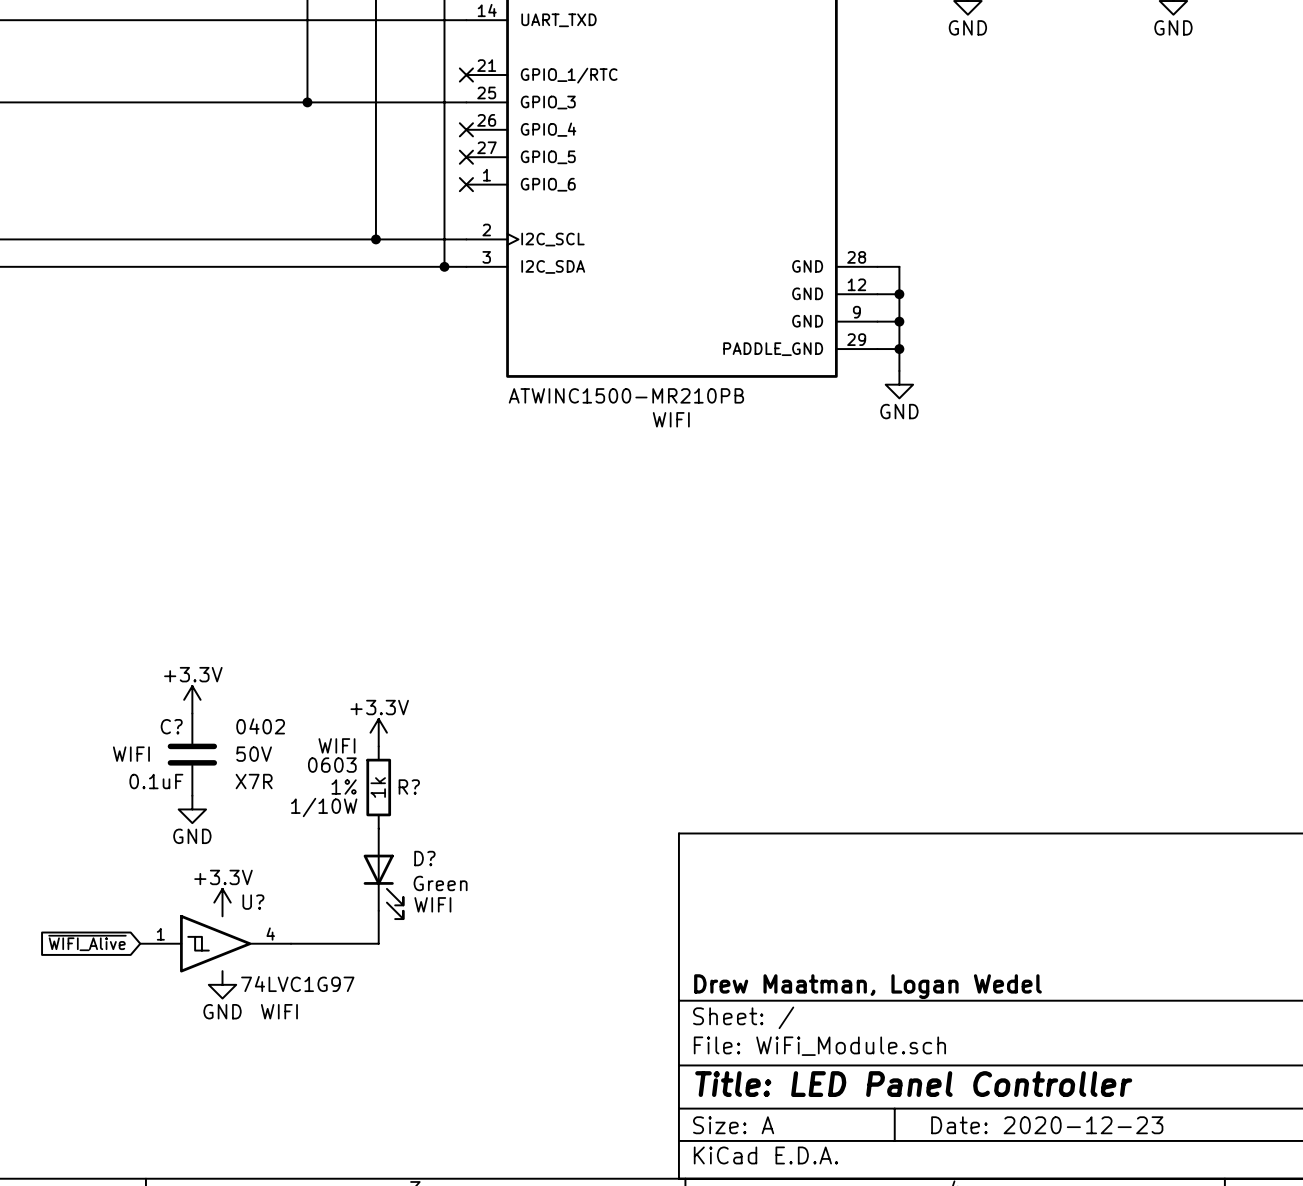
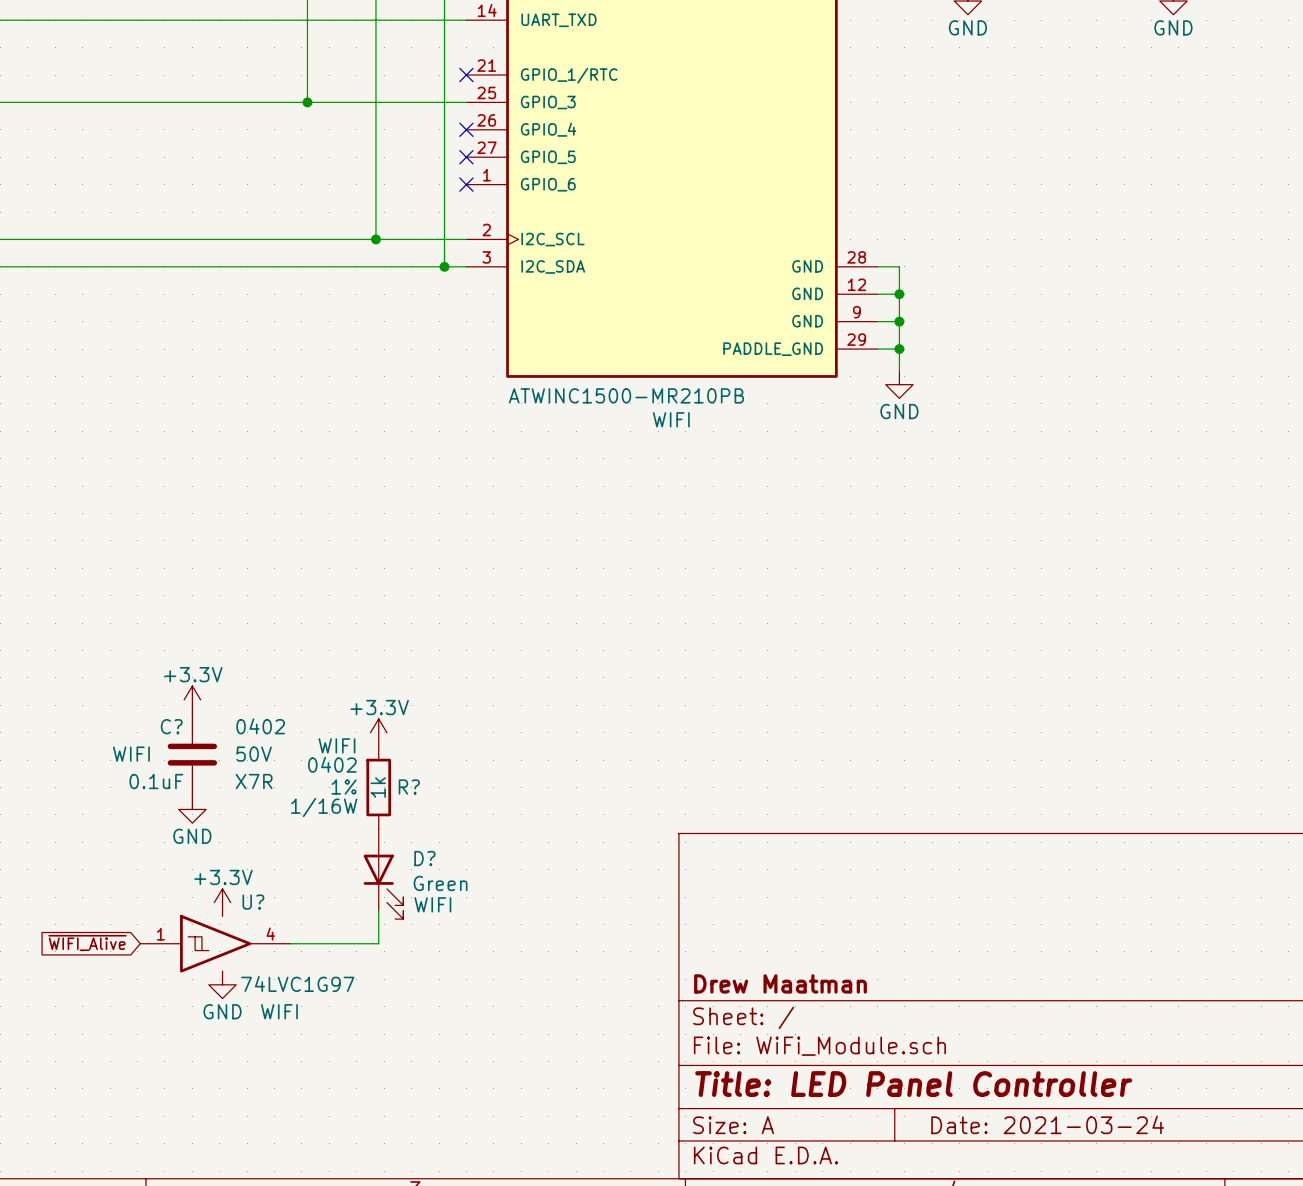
R? text: 0603 (332, 765) -> 0402 (332, 764)
R? text: 1/10W (324, 807) -> 1/16W (324, 807)
title block: Drew Maatman, Logan Wedel (867, 986) -> Drew Maatman (780, 983)
title block: Date: 2020-12-23 (1047, 1125) -> Date: 2021-03-24 (1047, 1124)

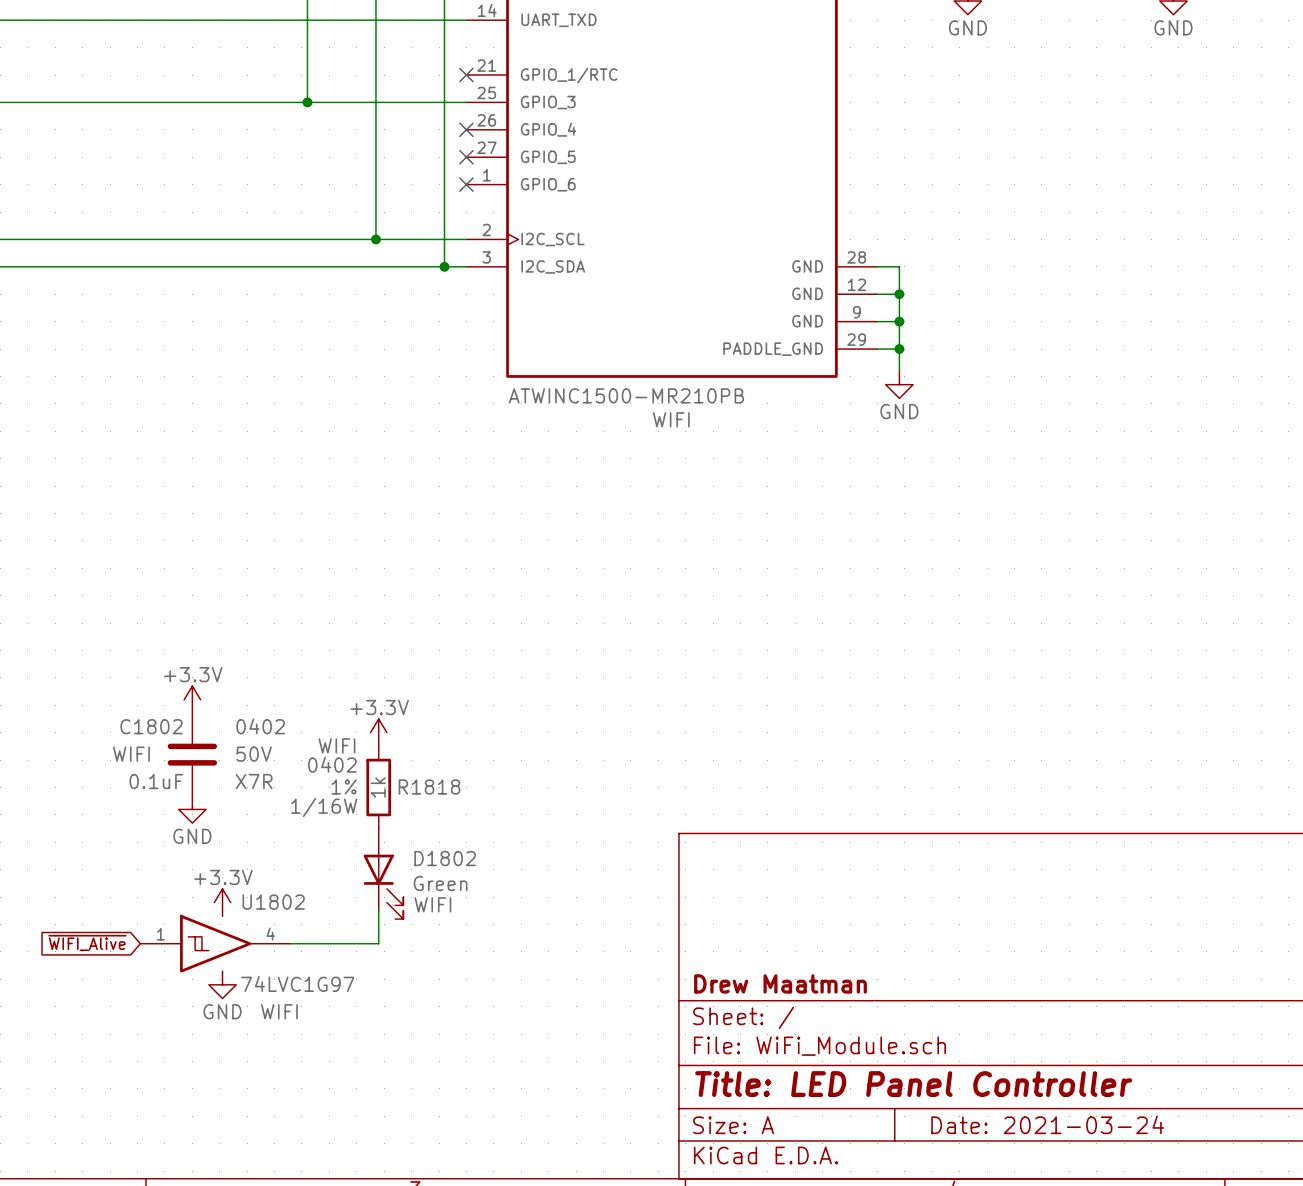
C? name: C? (171, 726) -> C1802 (151, 726)
R? name: R? (409, 787) -> R1818 (429, 787)
D? name: D? (424, 858) -> D1802 (445, 858)
U? name: U? (253, 902) -> U1802 (273, 902)

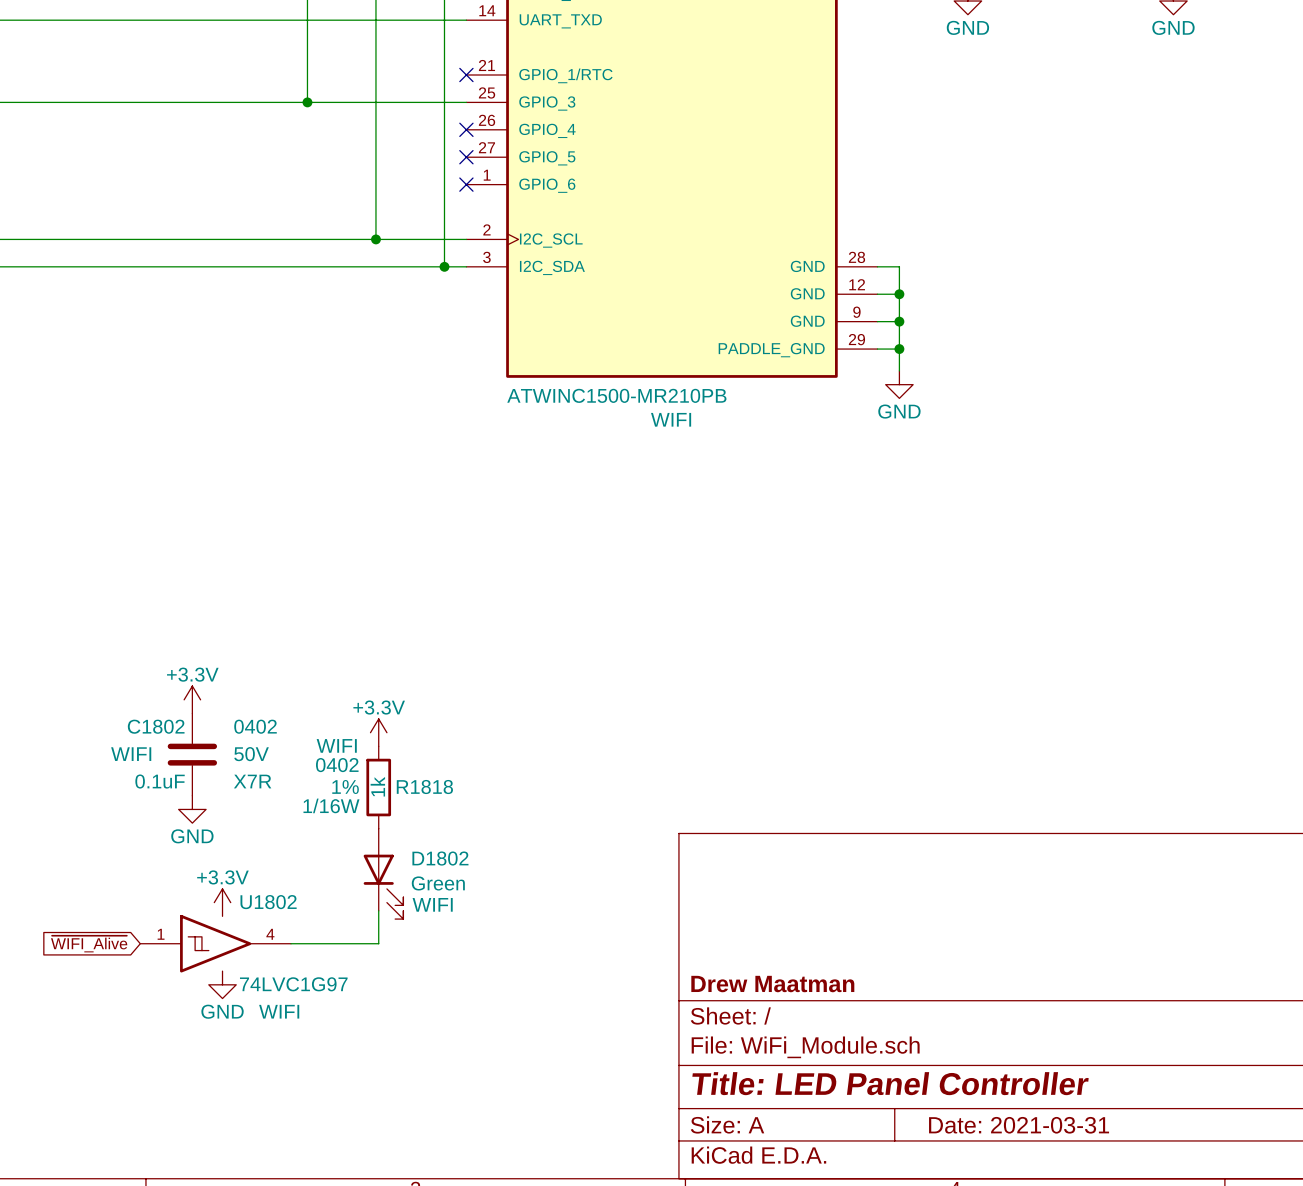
title block: Date: 2021-03-24 (1047, 1124) -> Date: 2021-03-31 (1019, 1125)

